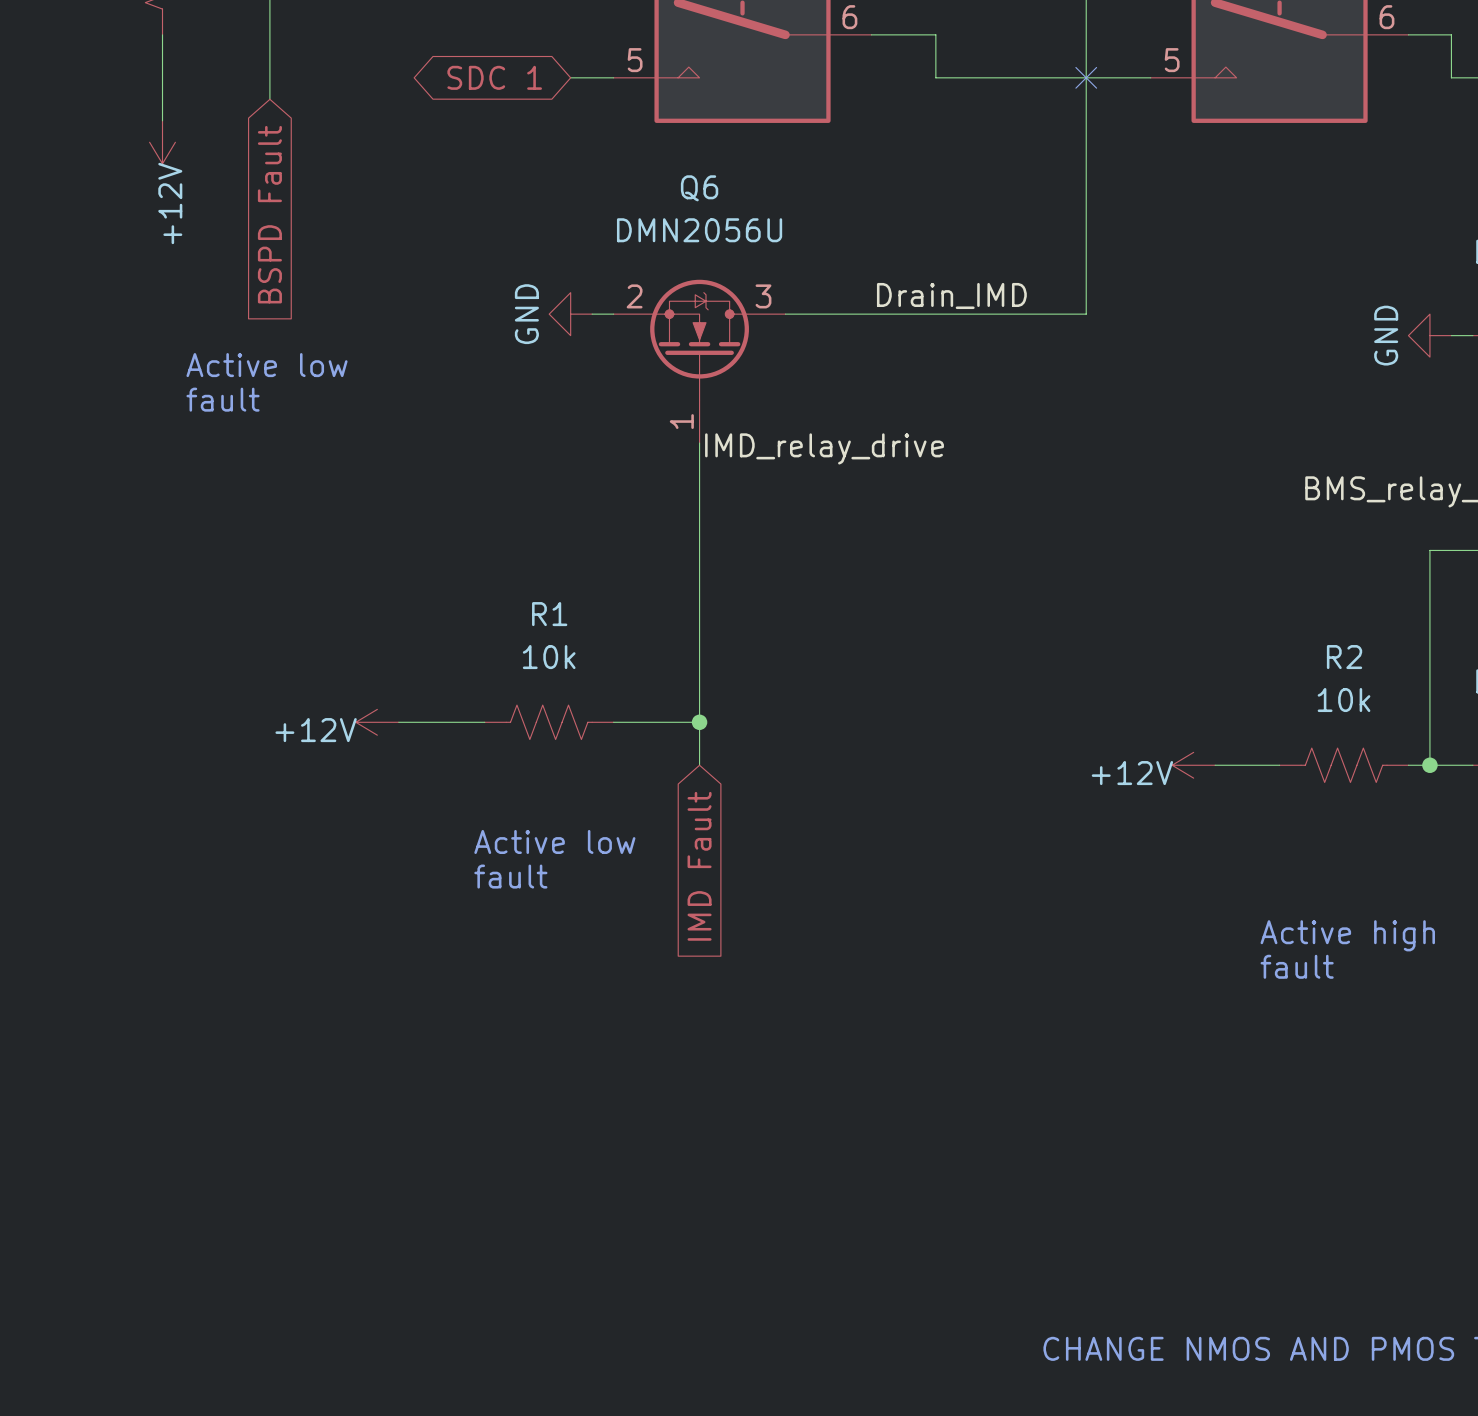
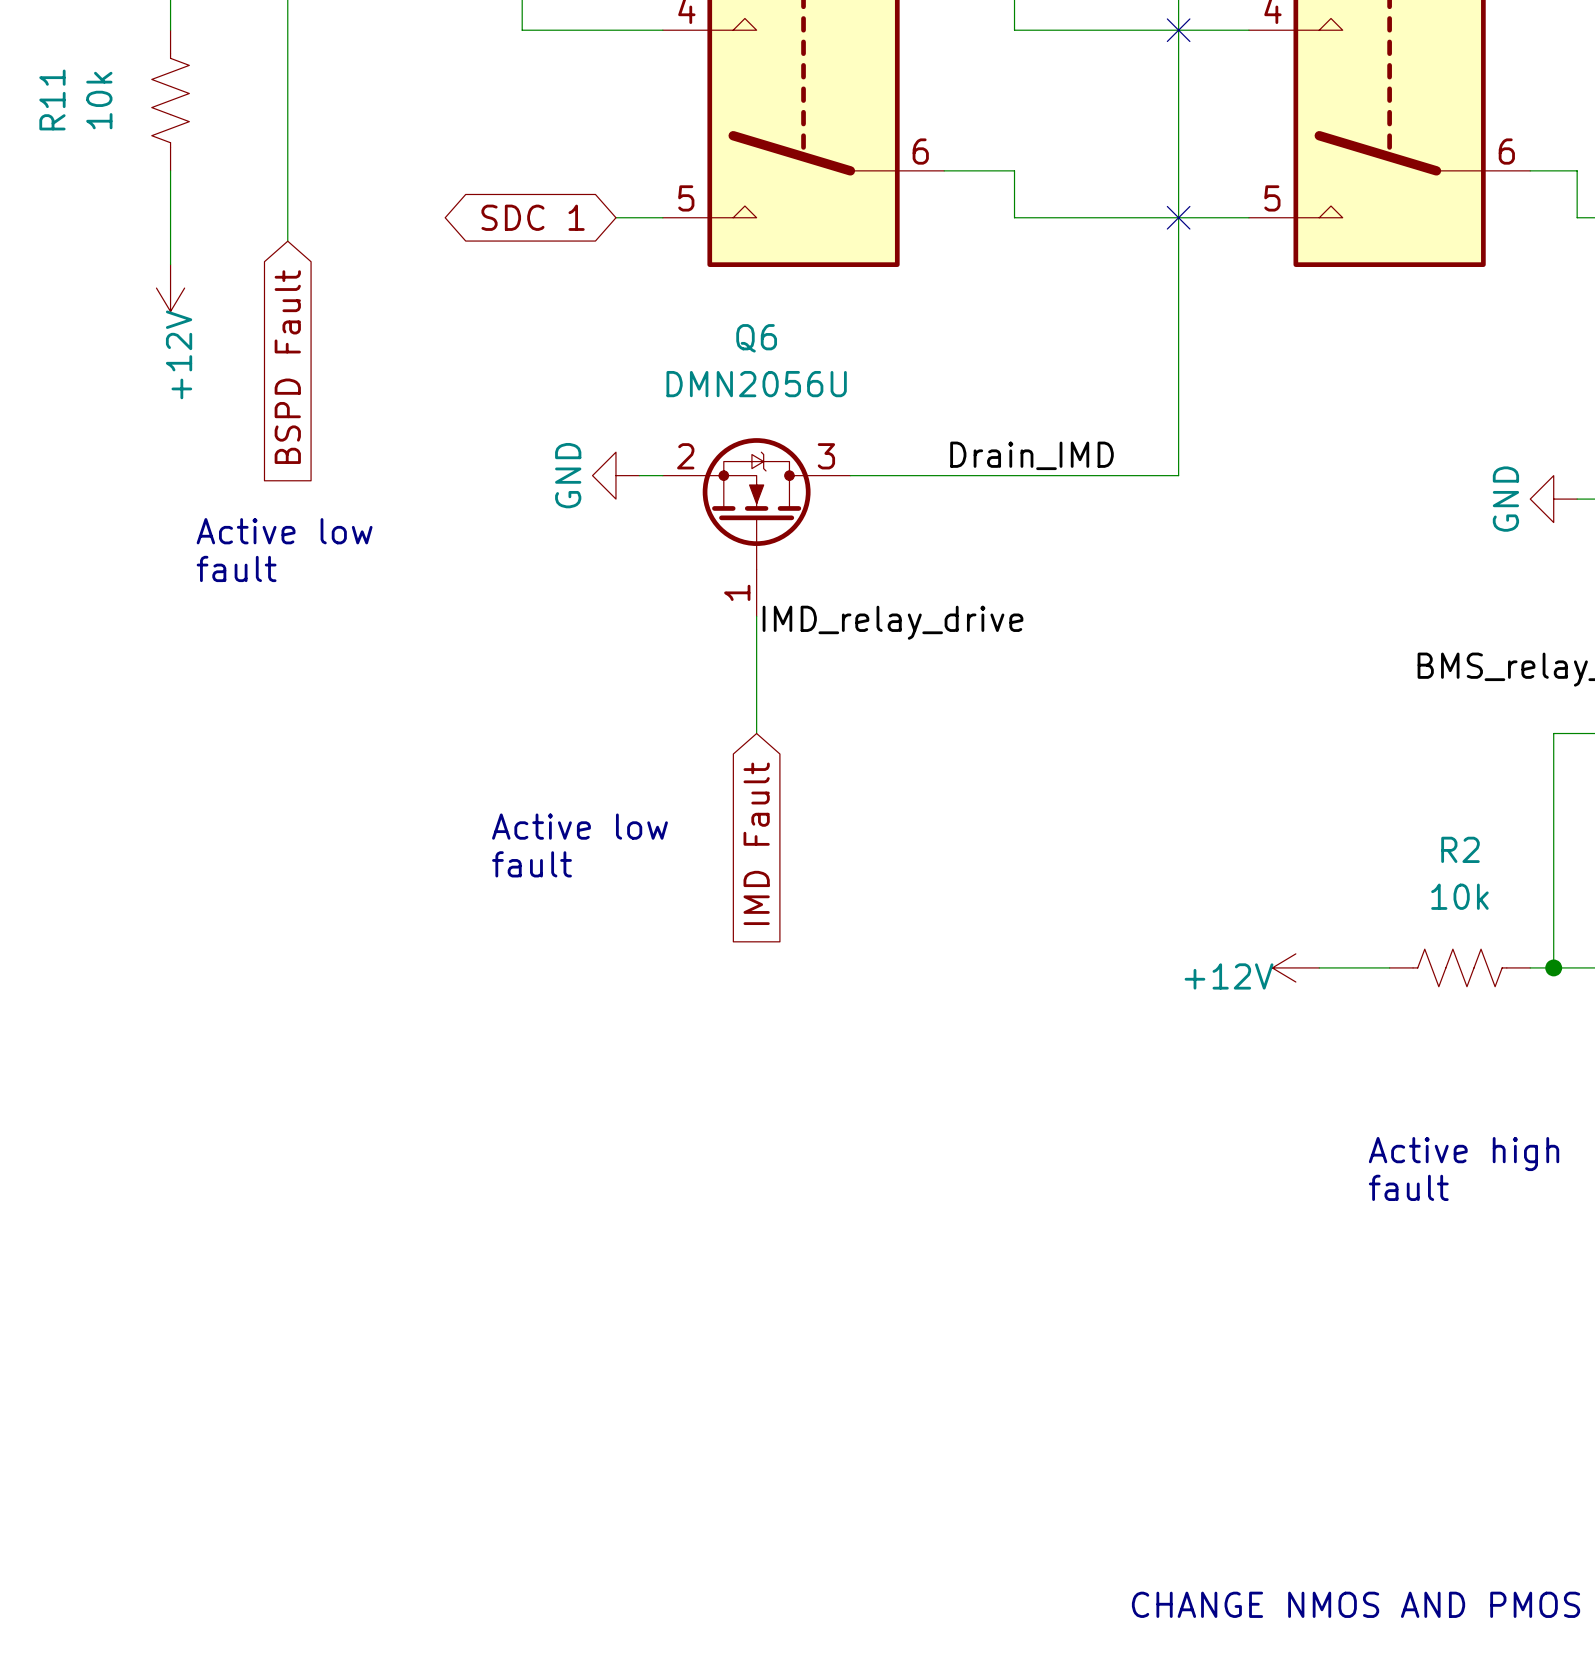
wire: (699, 550) (699, 765) -> none
power symbol: +12V (377, 722) -> none
wire: (398, 722) (484, 722) -> none
R1: 10k (549, 722) -> none
wire: (613, 722) (699, 722) -> none
junction: (699, 722) -> none
text position: Active low (554, 841) -> Active low (579, 826)
global label position: IMD Fault (699, 866) -> IMD Fault (756, 843)
text position: fault (510, 876) -> fault (531, 864)

